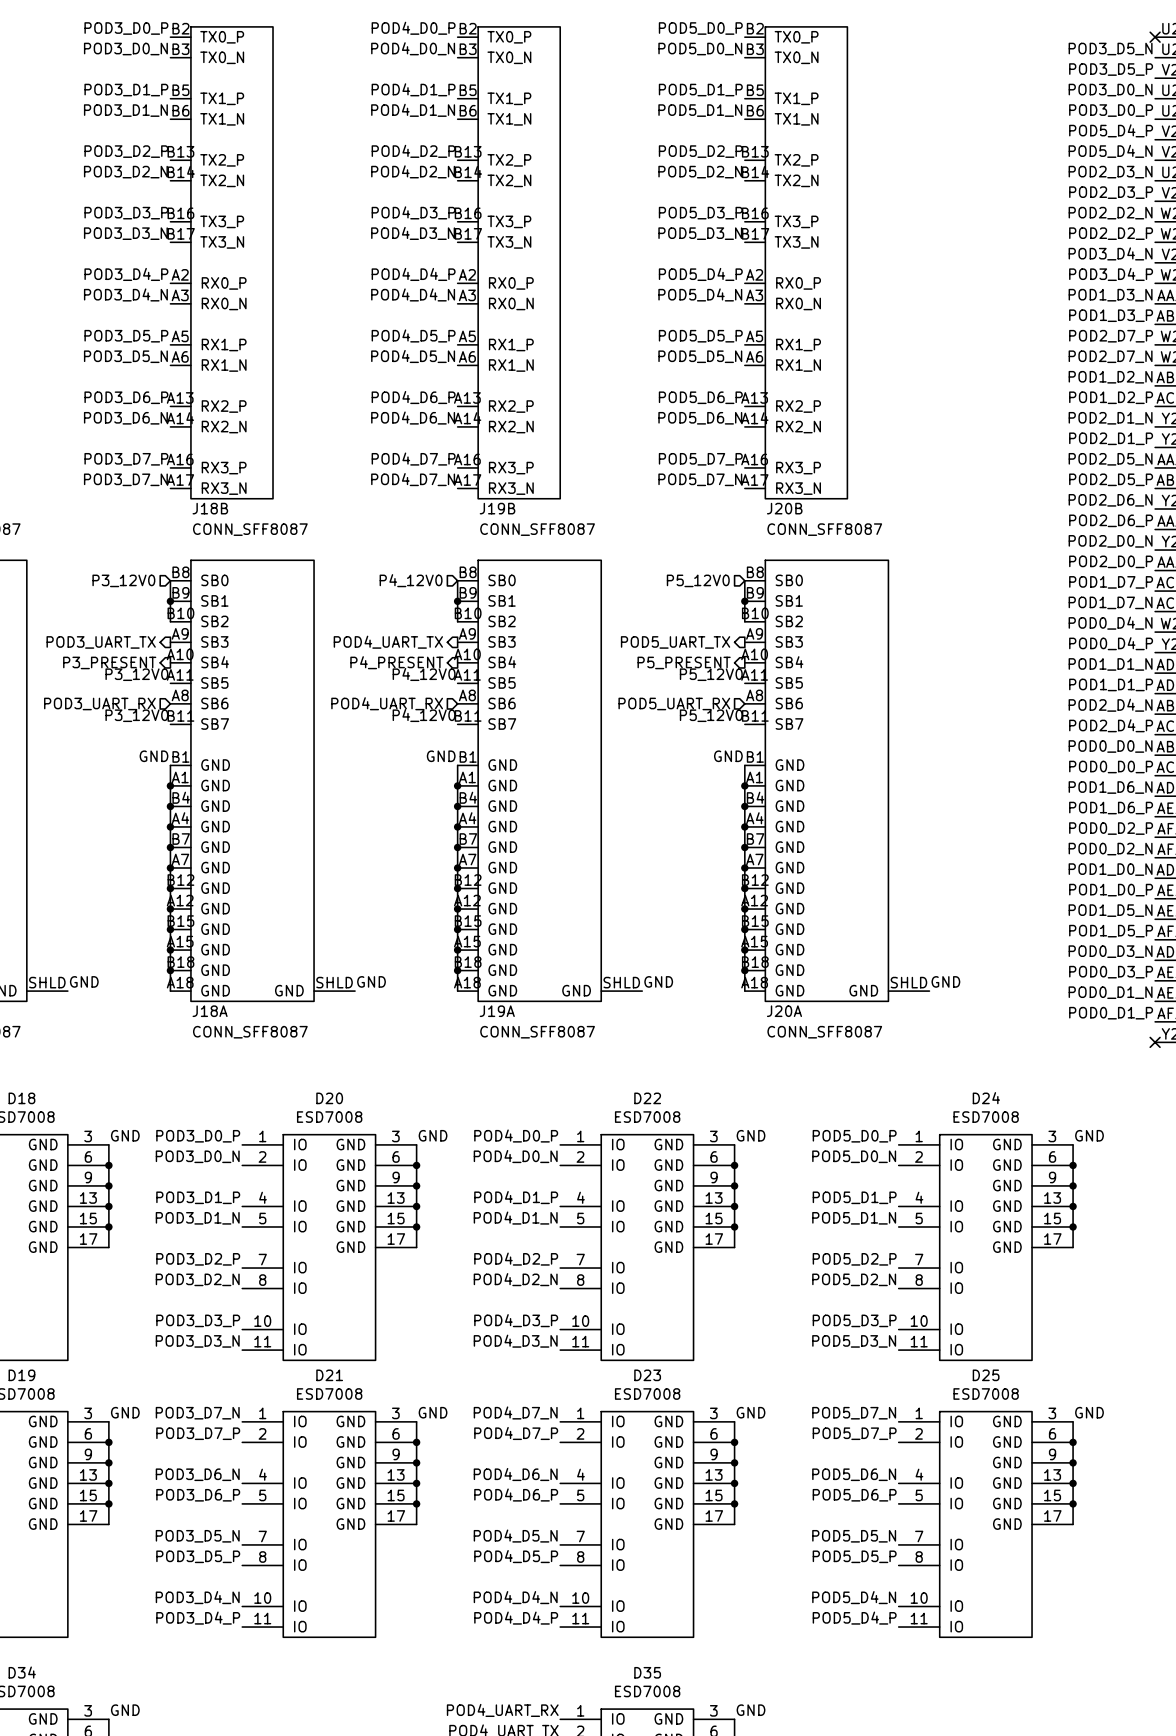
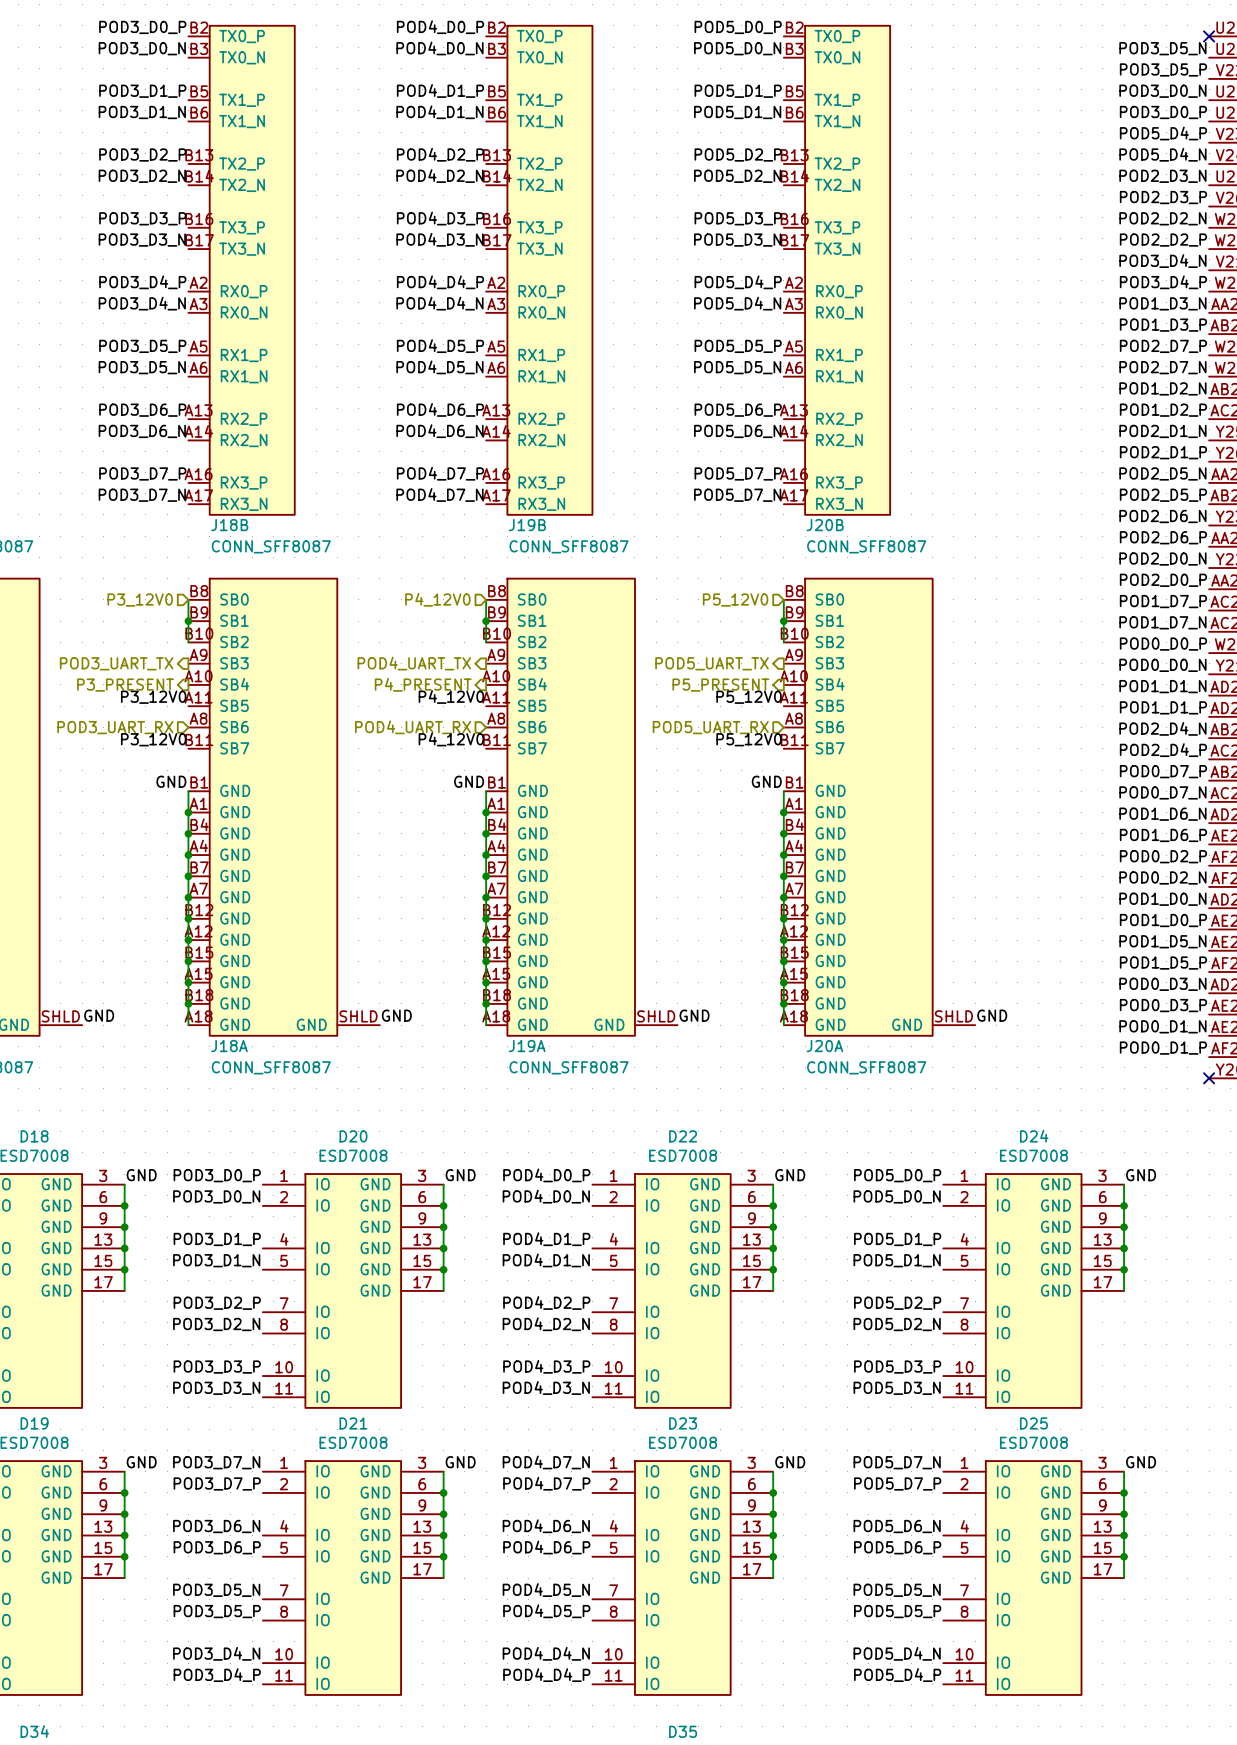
label: POD0_D4_N (1110, 623) -> POD0_D0_P (1163, 644)
label: POD0_D4_P (1111, 643) -> POD0_D0_N (1162, 665)
label: POD0_D0_N (1110, 746) -> POD0_D7_P (1163, 771)
label: POD0_D0_P (1111, 767) -> POD0_D7_N (1162, 792)

